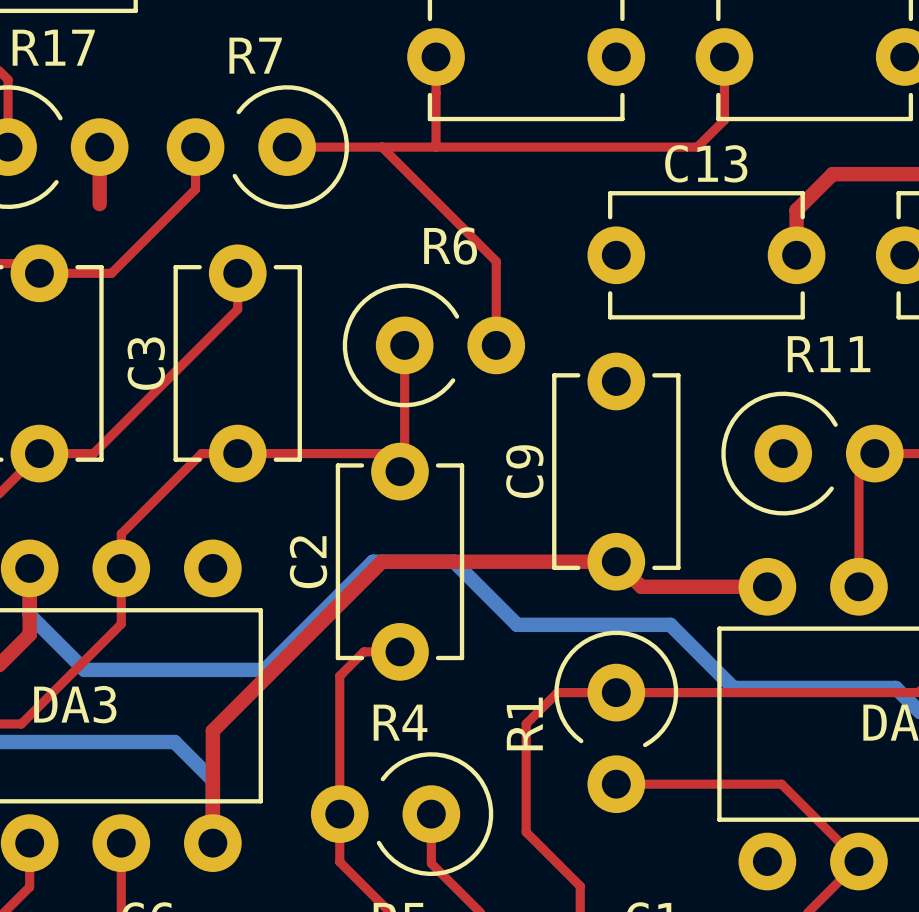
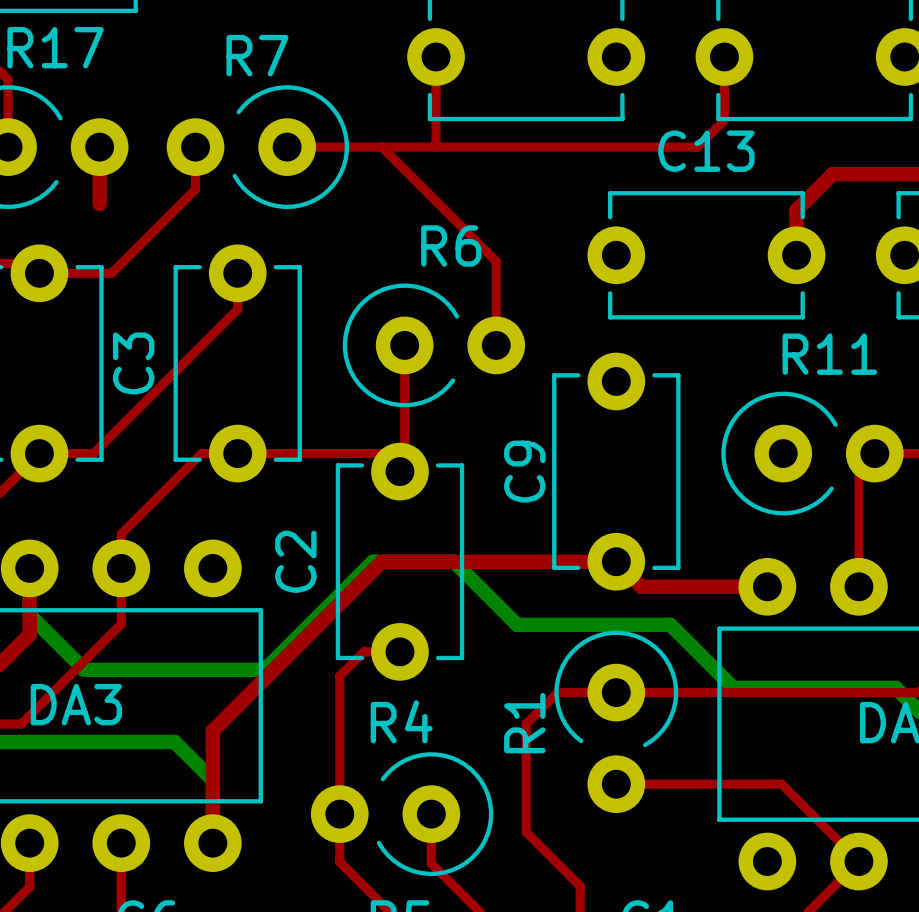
C13 name position: C13 (706, 163) -> C13 (706, 151)
C3 name position: C3 (146, 363) -> C3 (133, 363)
C2 name position: C2 (308, 562) -> C2 (295, 561)

